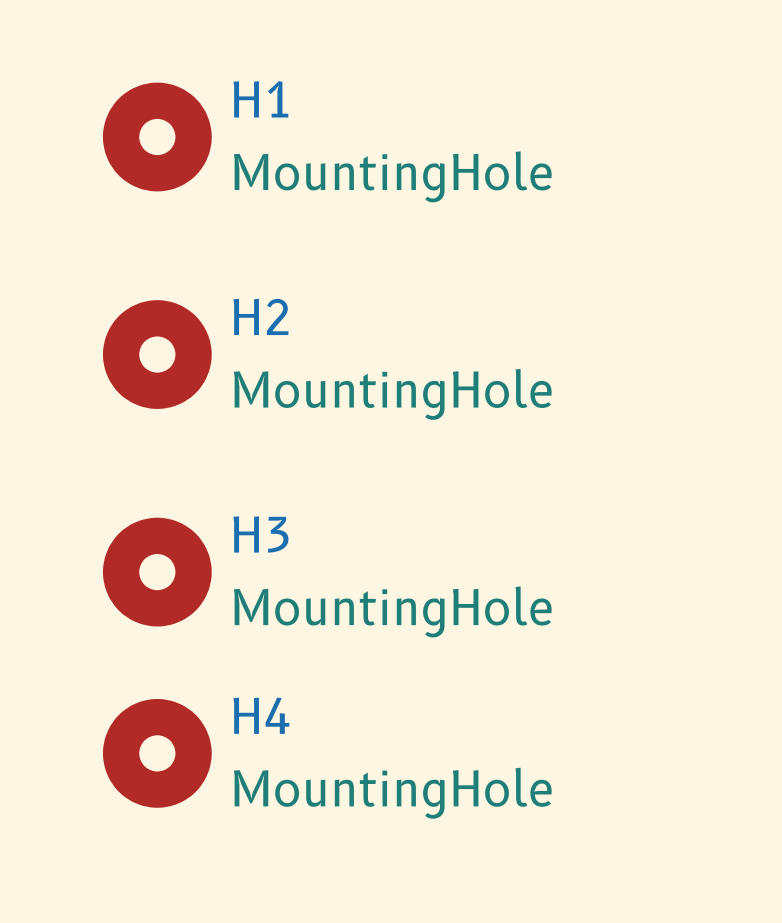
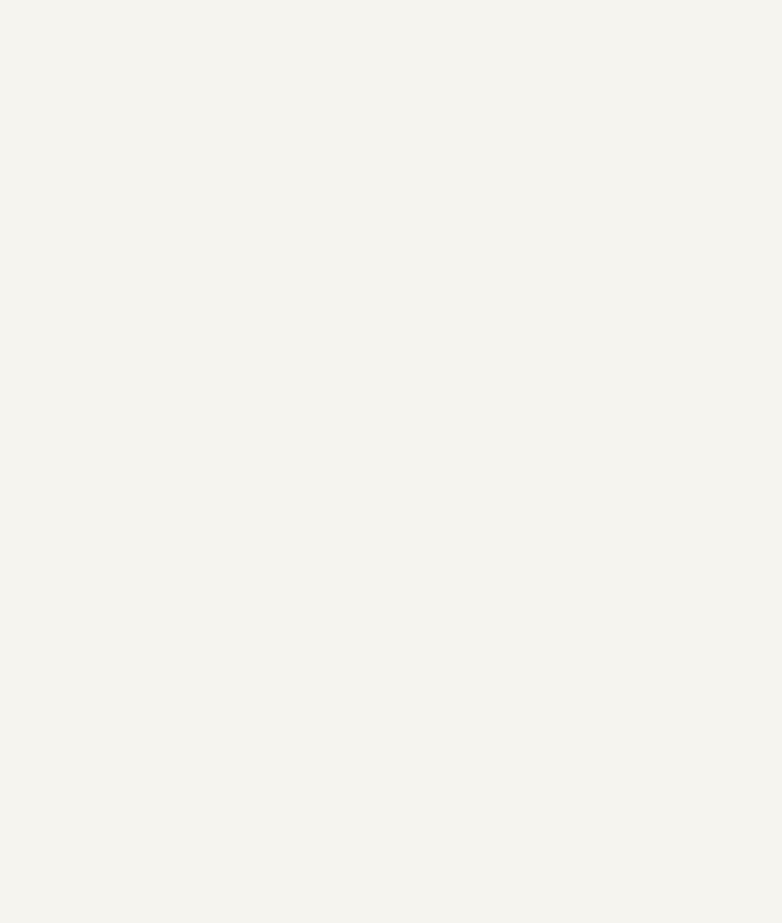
H1: MountingHole (157, 137) -> none
H2: MountingHole (157, 354) -> none
H3: MountingHole (157, 572) -> none
H4: MountingHole (157, 753) -> none

